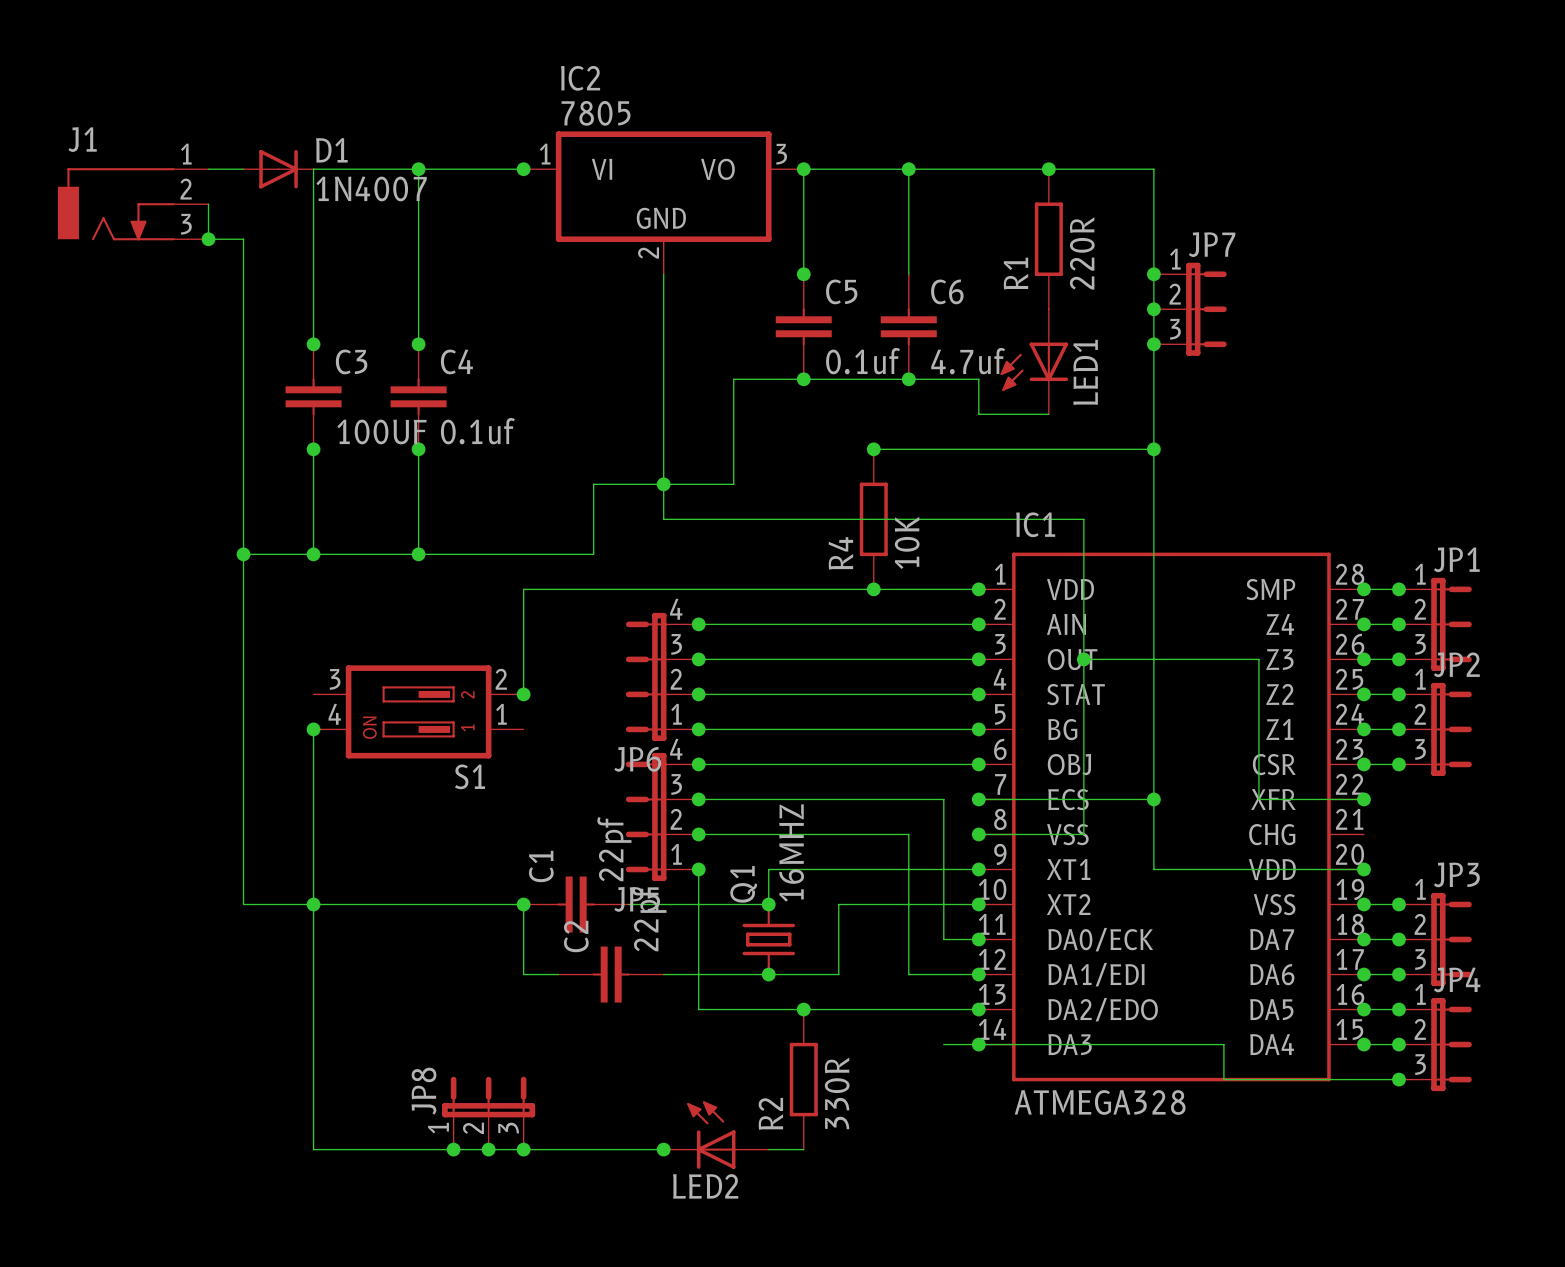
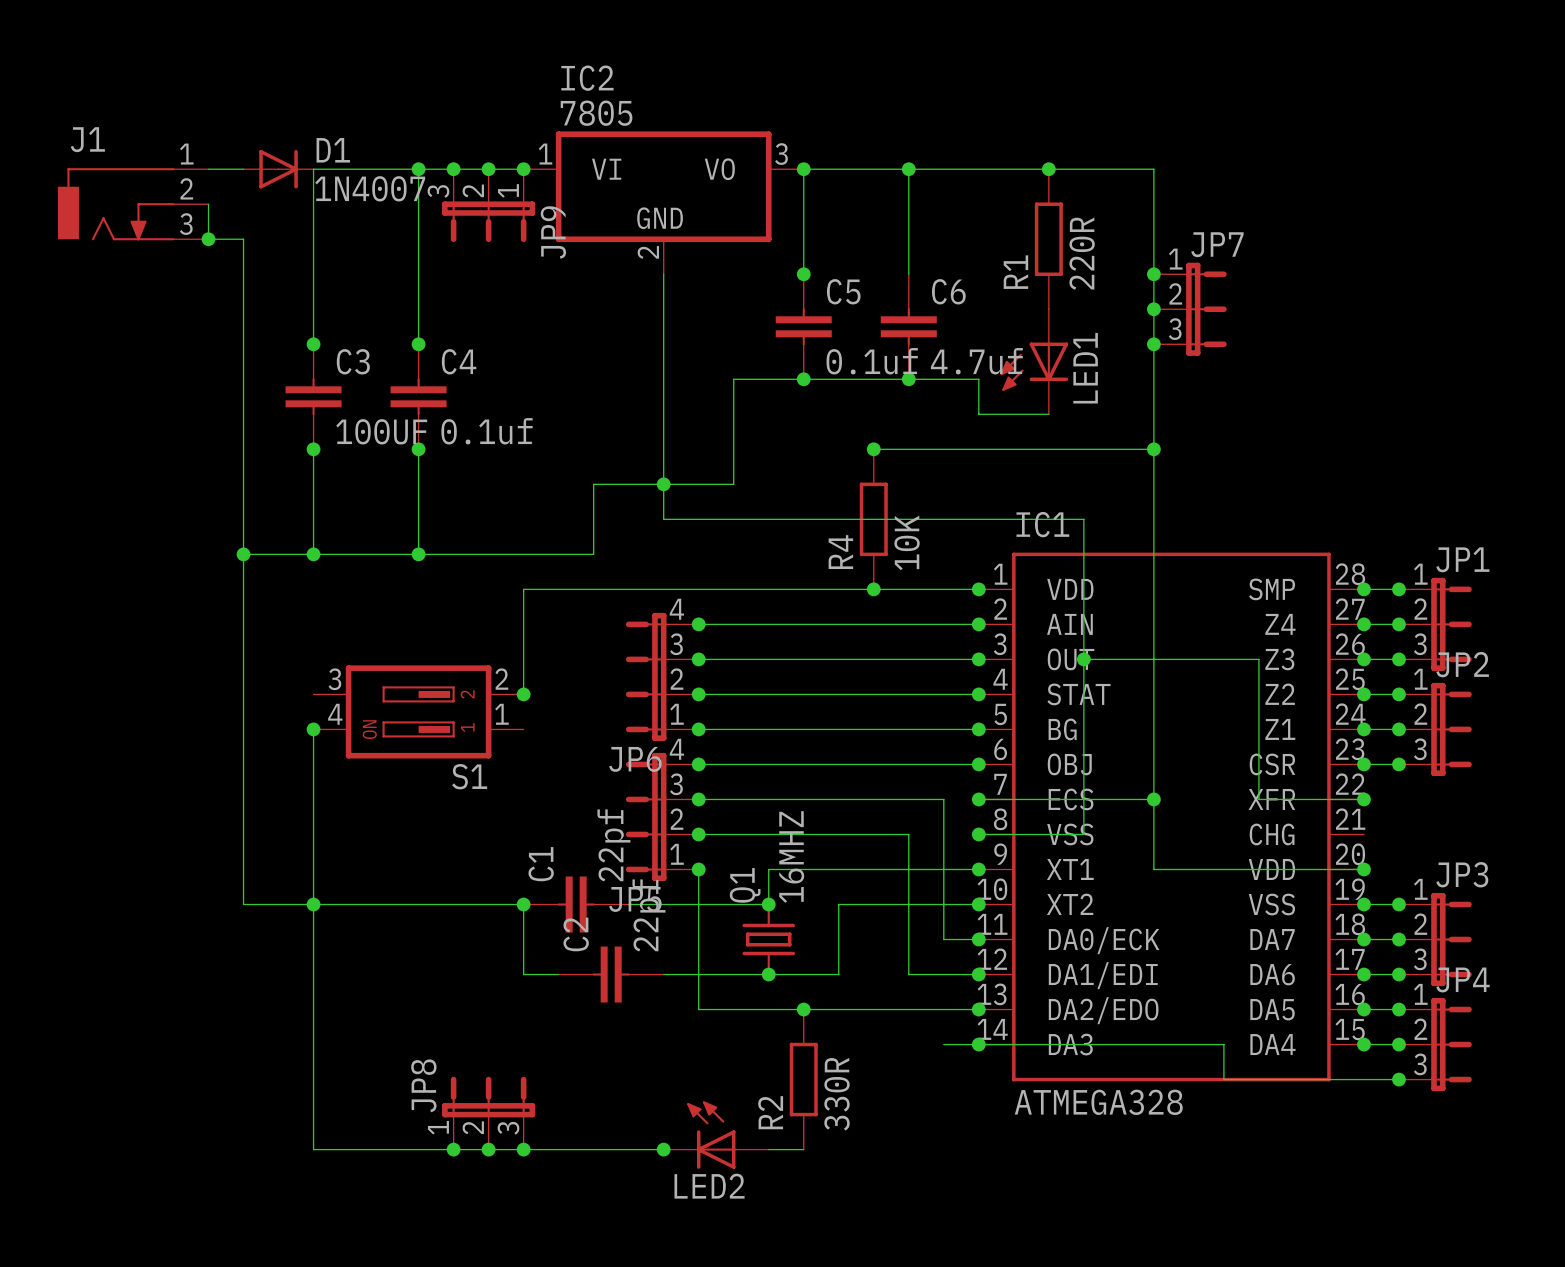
junction: none -> (453, 169)
junction: none -> (488, 169)
JP9: none -> (488, 205)

